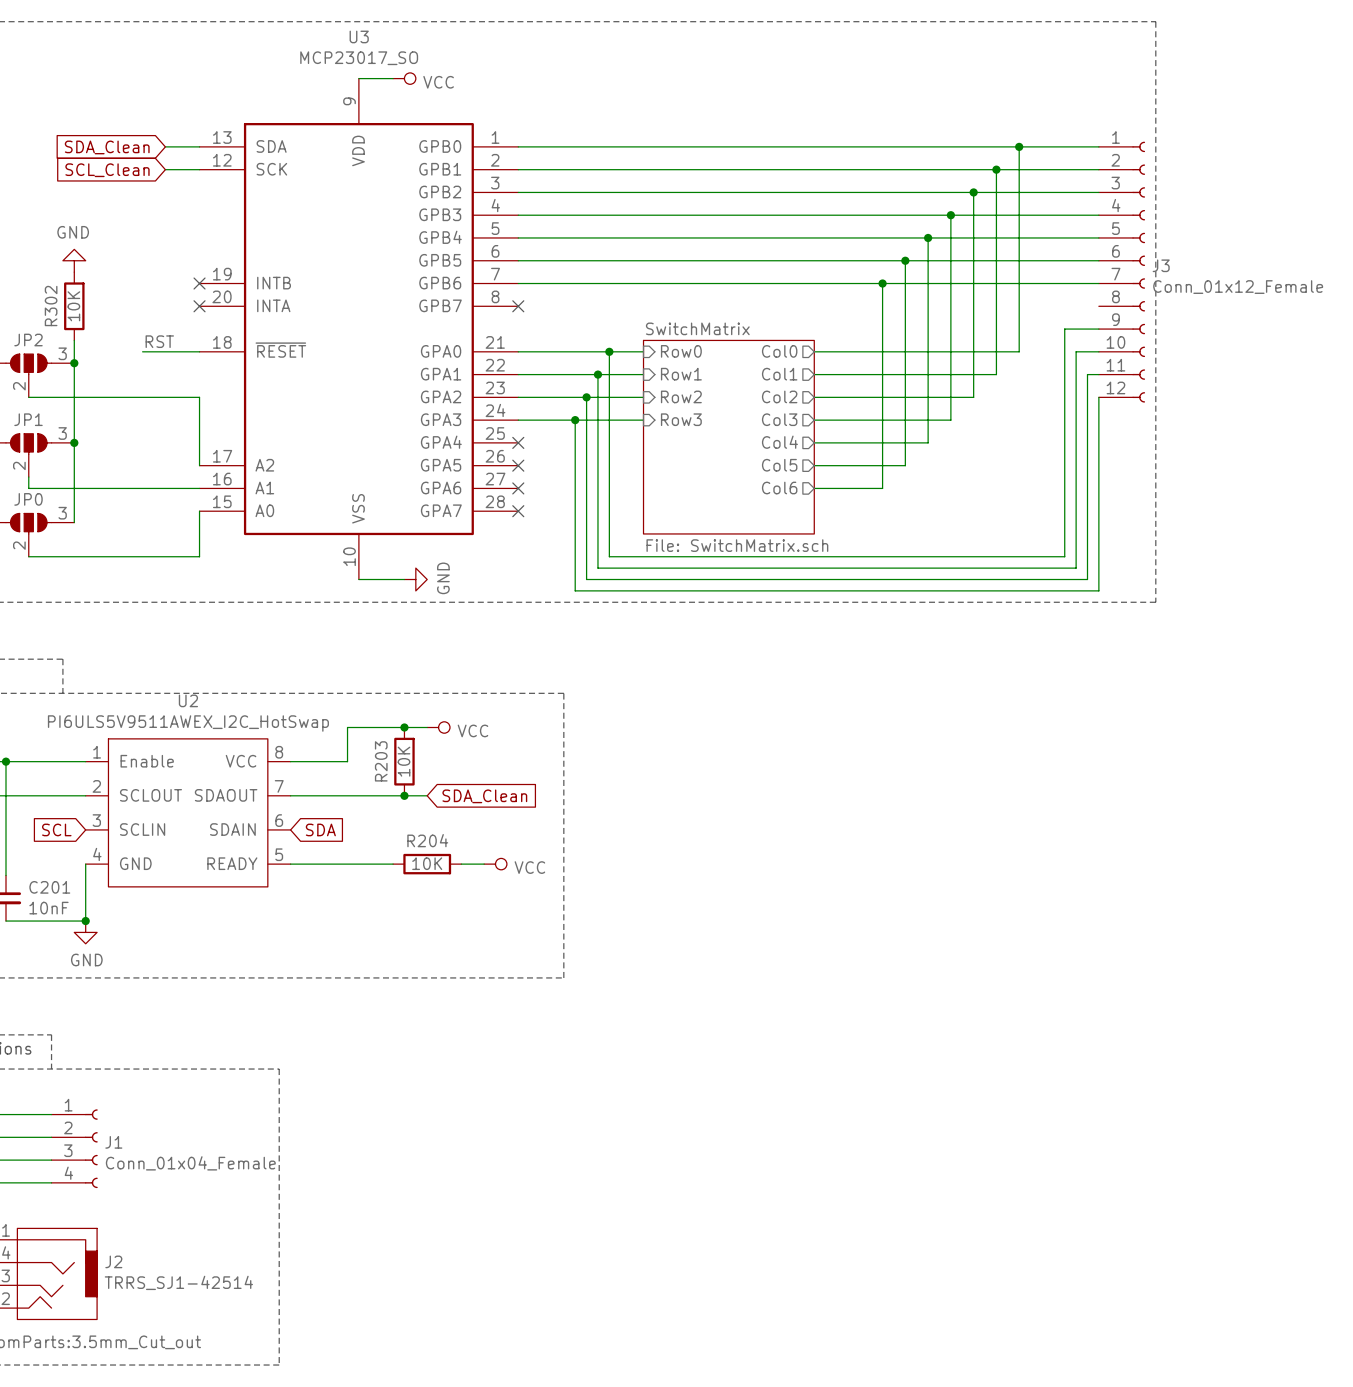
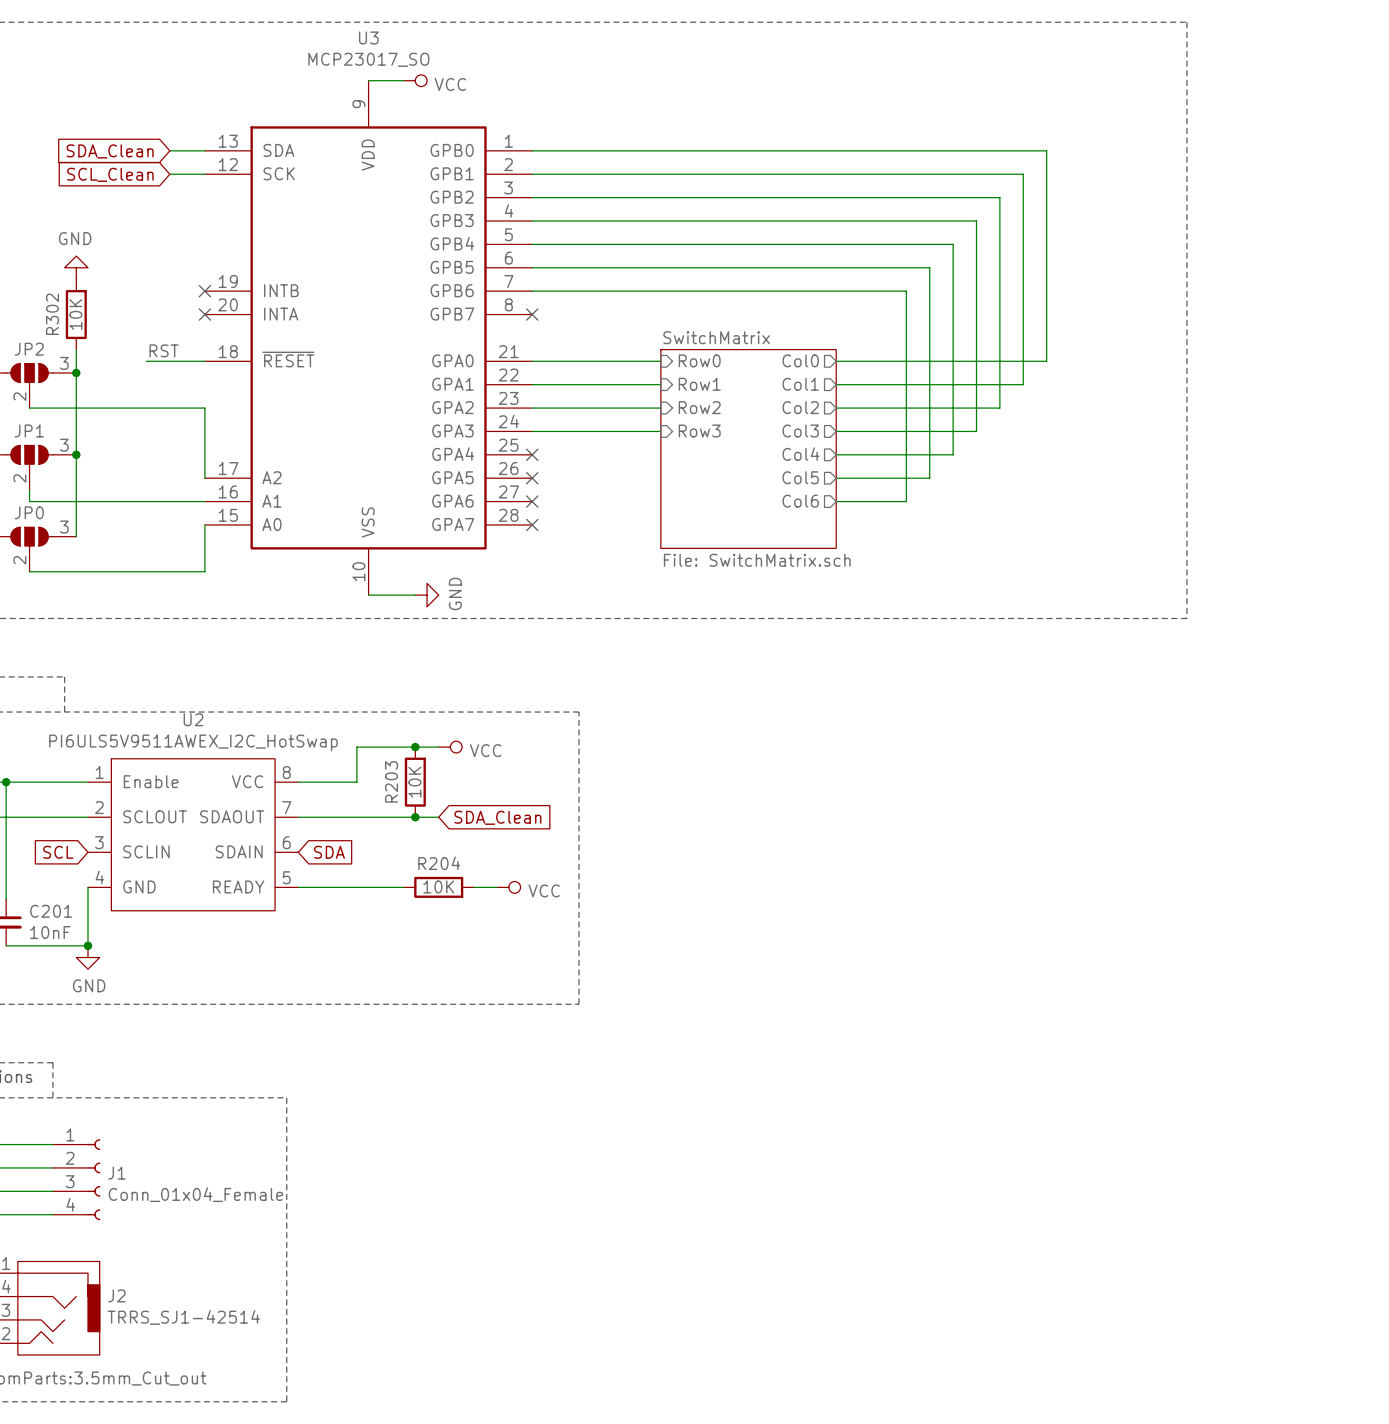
wire: (1019, 146) (1098, 146) -> none
junction: (1019, 146) -> none
wire: (996, 169) (1098, 169) -> none
junction: (996, 169) -> none
wire: (973, 192) (1098, 192) -> none
junction: (973, 192) -> none
wire: (950, 215) (1098, 215) -> none
junction: (950, 215) -> none
wire: (928, 237) (1098, 237) -> none
junction: (928, 237) -> none
wire: (905, 260) (1098, 260) -> none
junction: (905, 260) -> none
J3: Conn_01x12_Female (1121, 272) -> none
wire: (882, 283) (1098, 283) -> none
junction: (882, 283) -> none
wire: (1098, 329) (1064, 329) (1064, 556) (609, 556) (609, 351) -> none
junction: (609, 351) -> none
wire: (1098, 351) (1076, 351) (1076, 568) (597, 568) (597, 374) -> none
junction: (597, 374) -> none
wire: (1098, 374) (1087, 374) (1087, 579) (586, 579) (586, 397) -> none
junction: (586, 397) -> none
wire: (1098, 397) (1098, 590) (575, 590) (575, 420) -> none
junction: (575, 420) -> none

